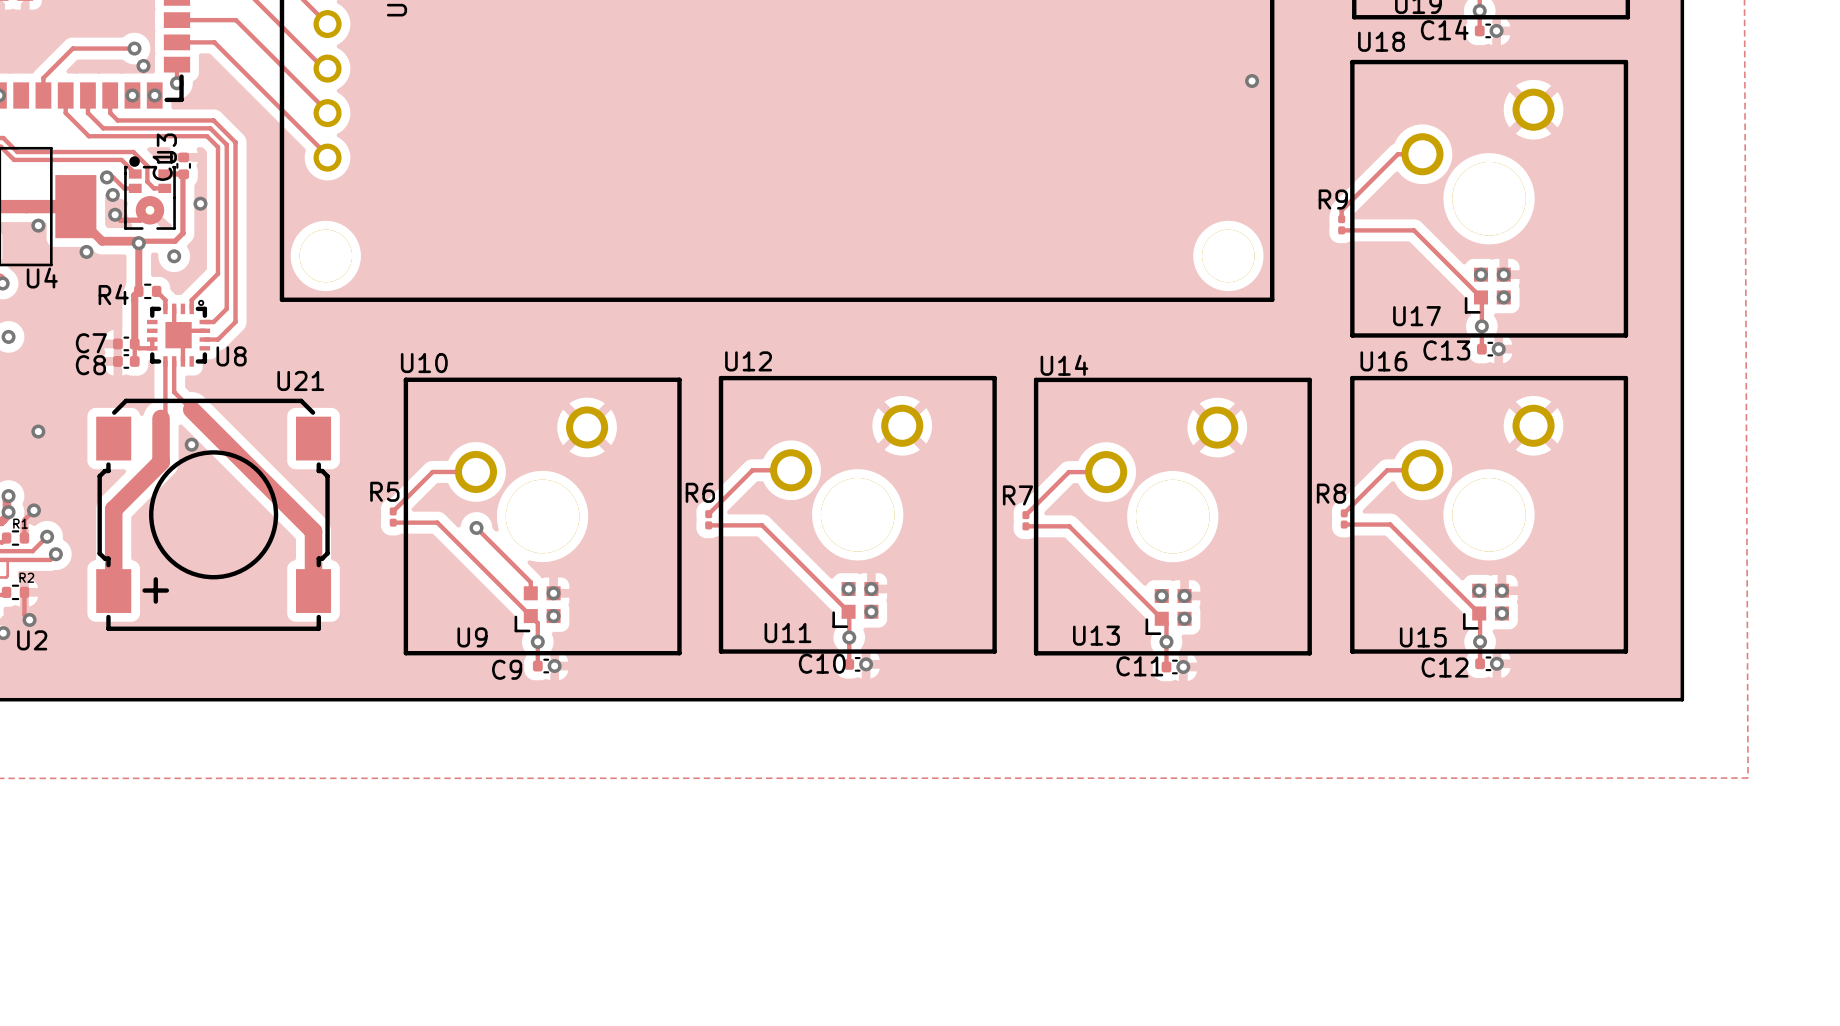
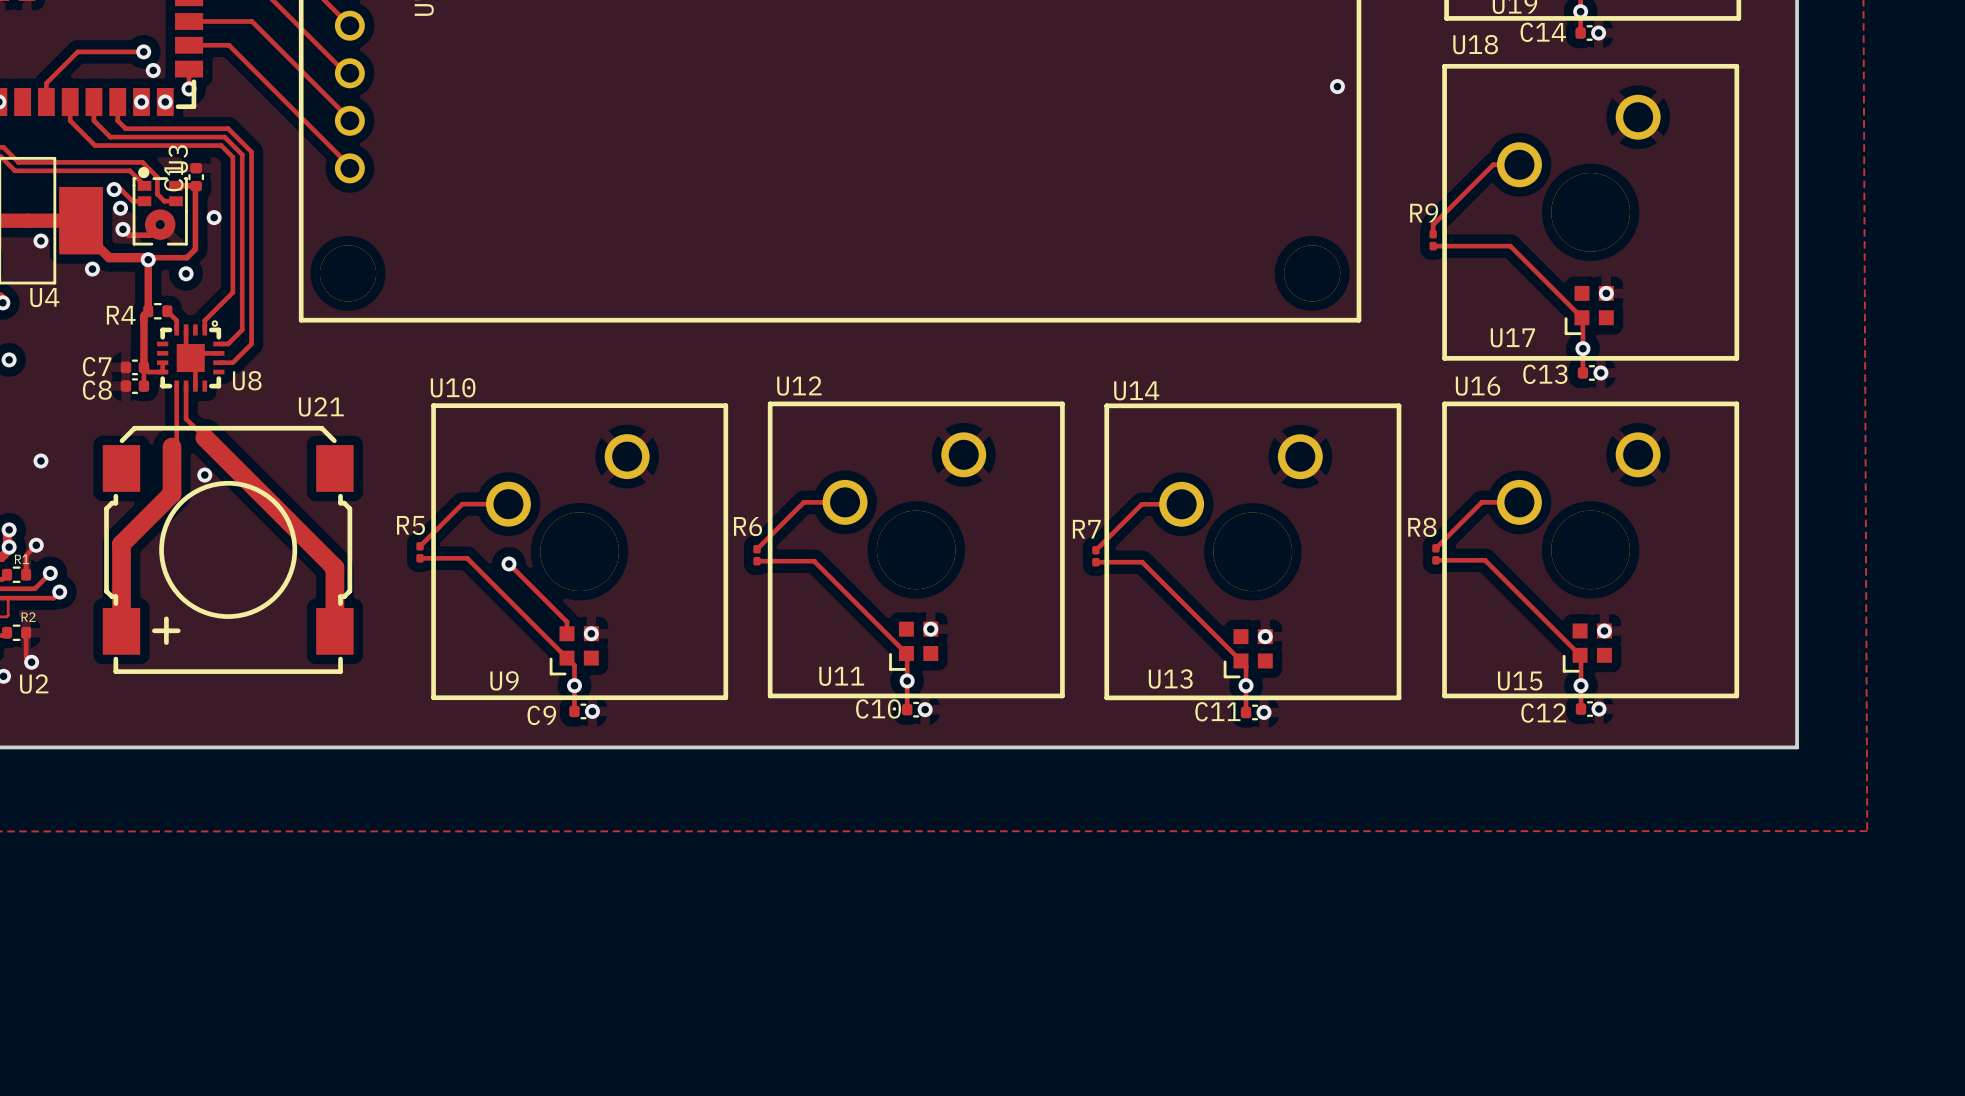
via: (1481, 274) -> none
via: (1503, 297) -> none
via: (848, 588) -> none
via: (1479, 590) -> none
via: (1161, 596) -> none
via: (871, 611) -> none
via: (1501, 613) -> none
via: (553, 616) -> none
via: (1184, 618) -> none

